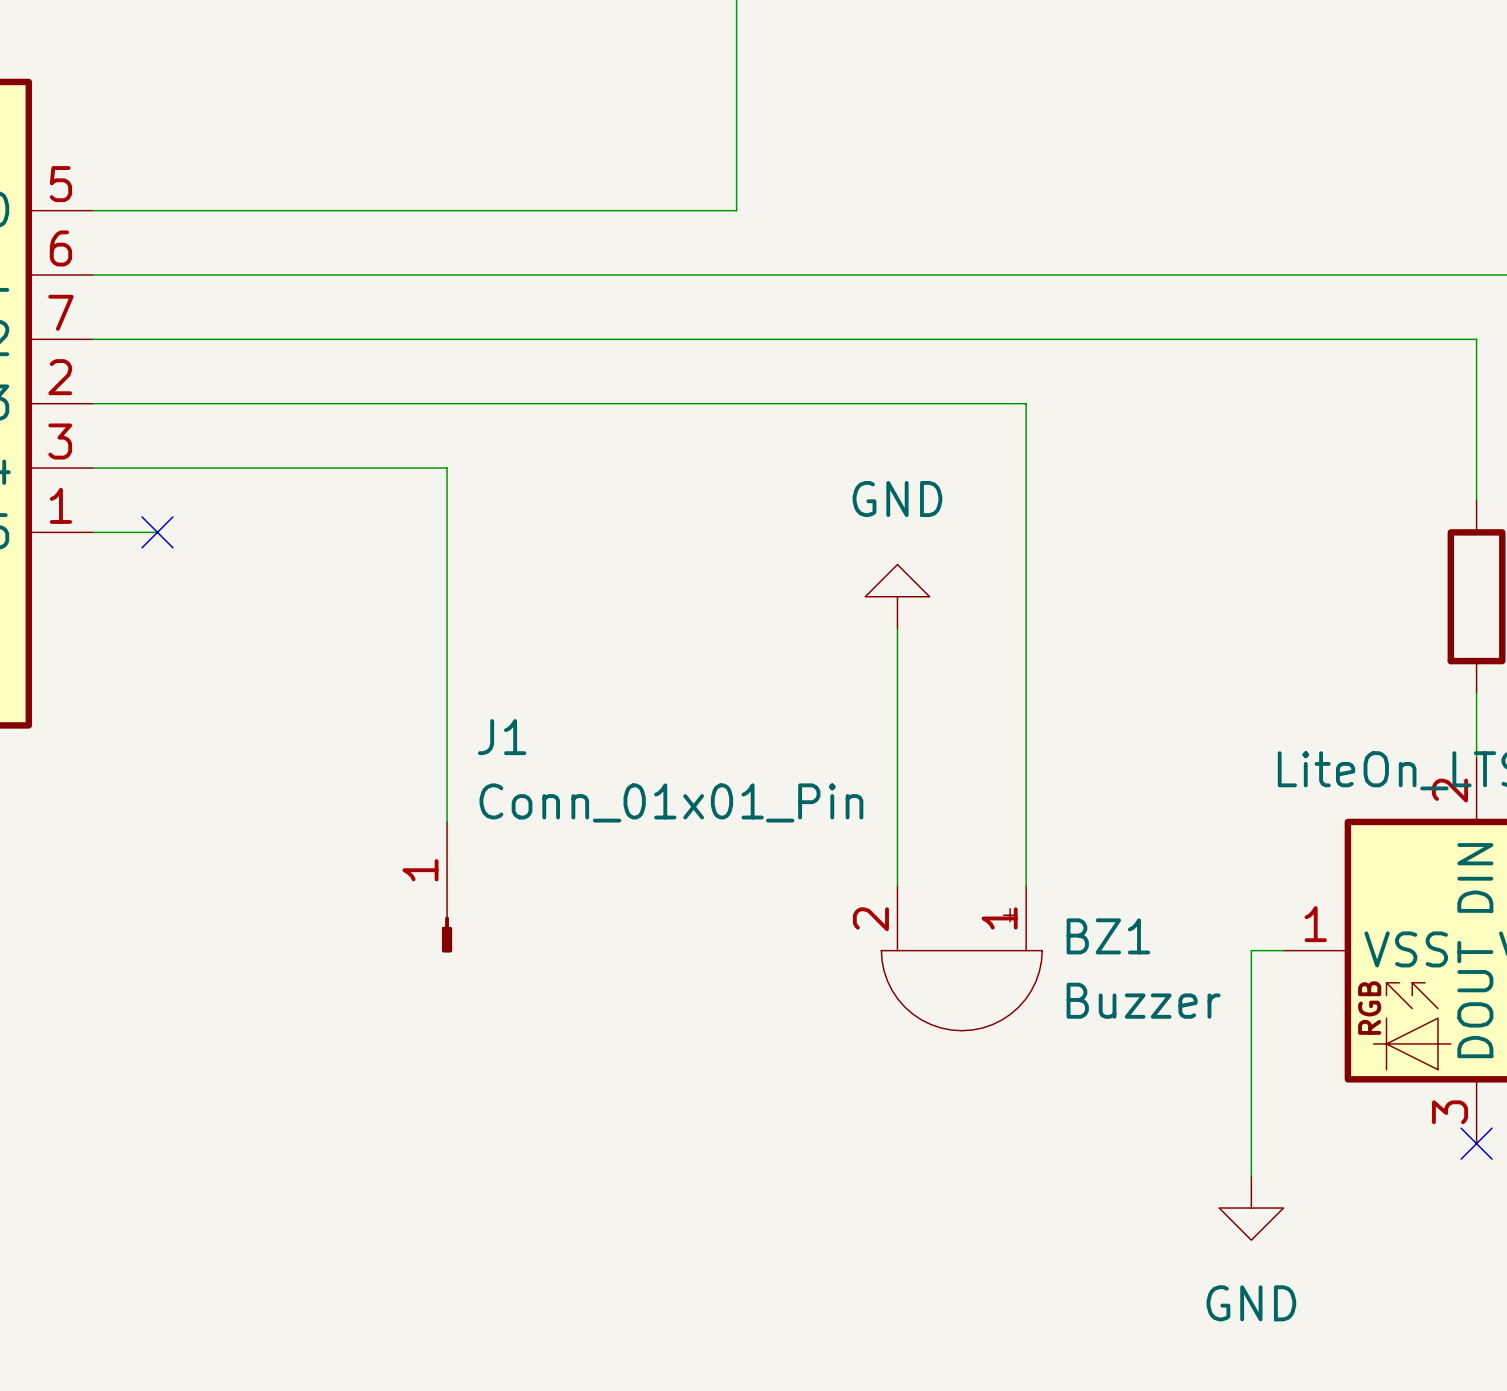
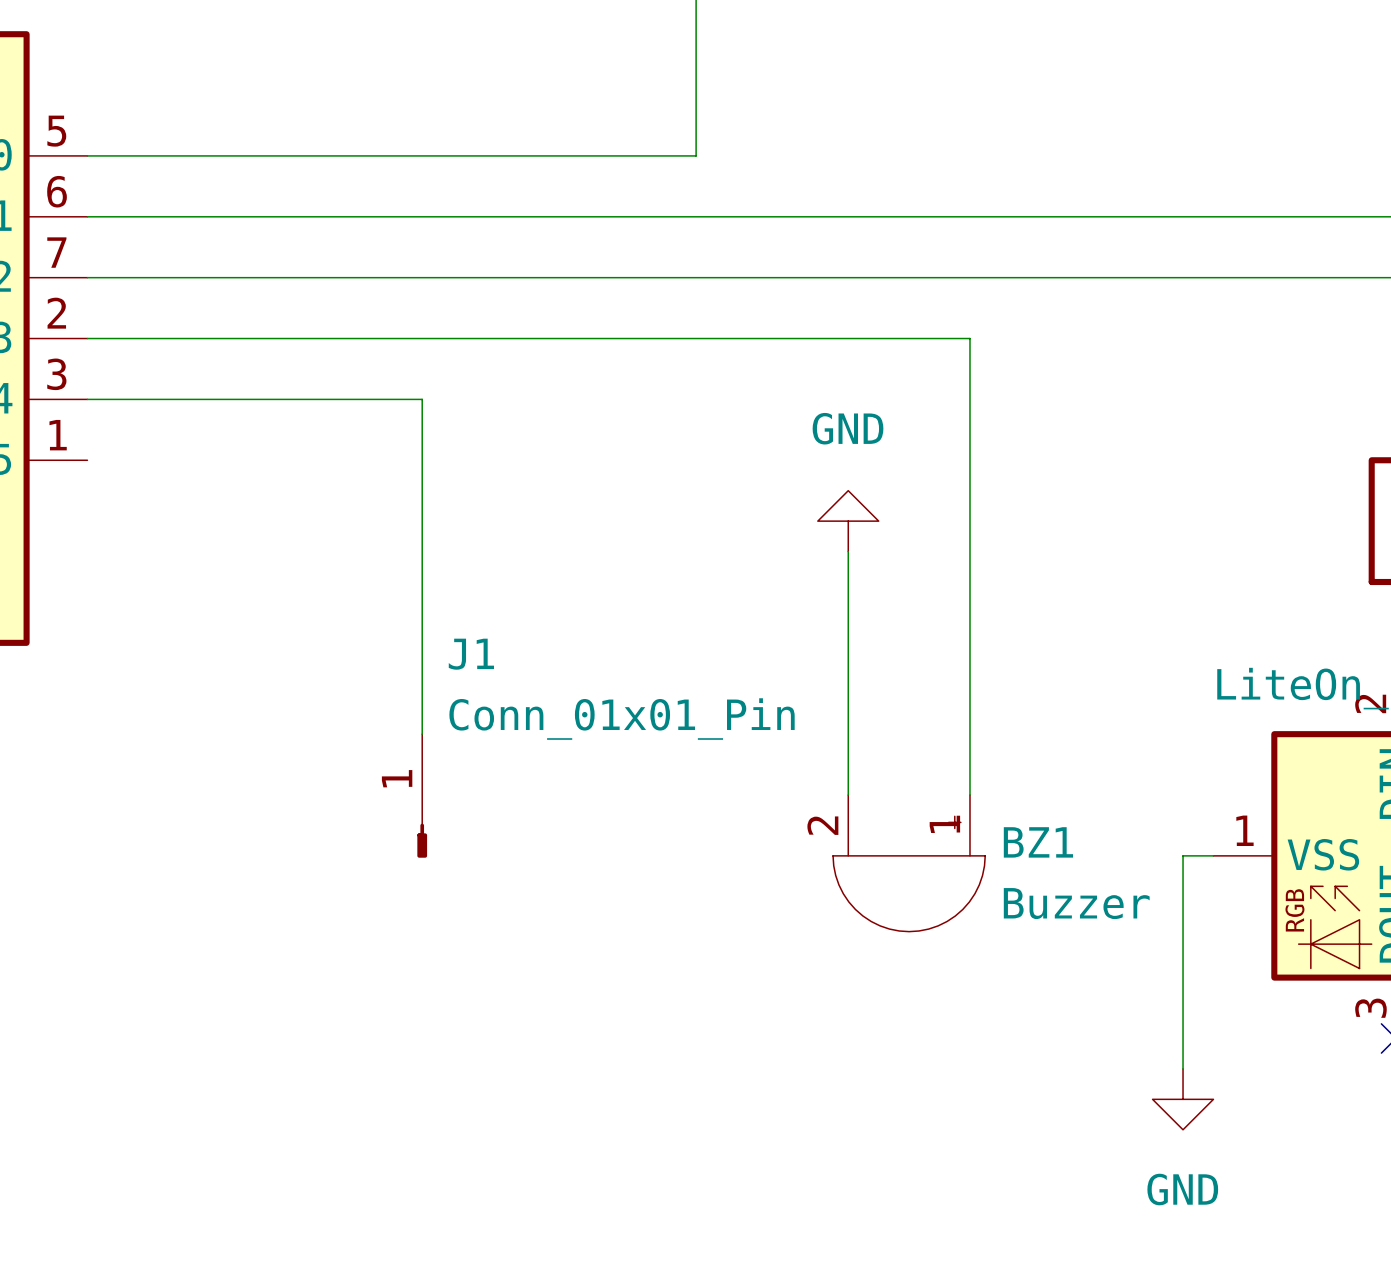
wire: (93, 532) (157, 532) -> none
no-connect mark: (157, 532) -> none

